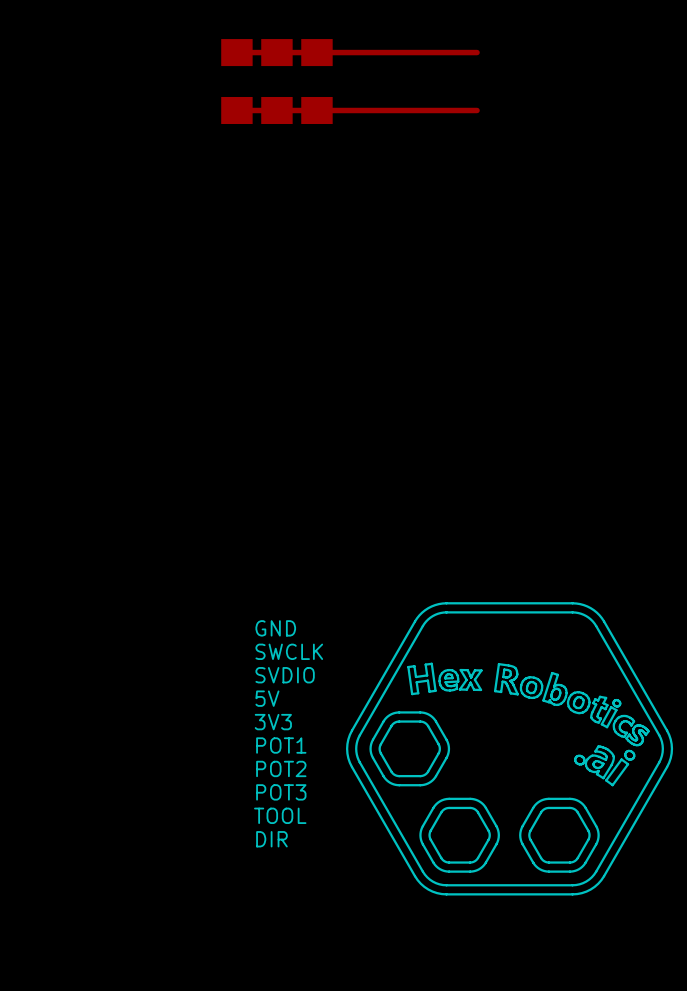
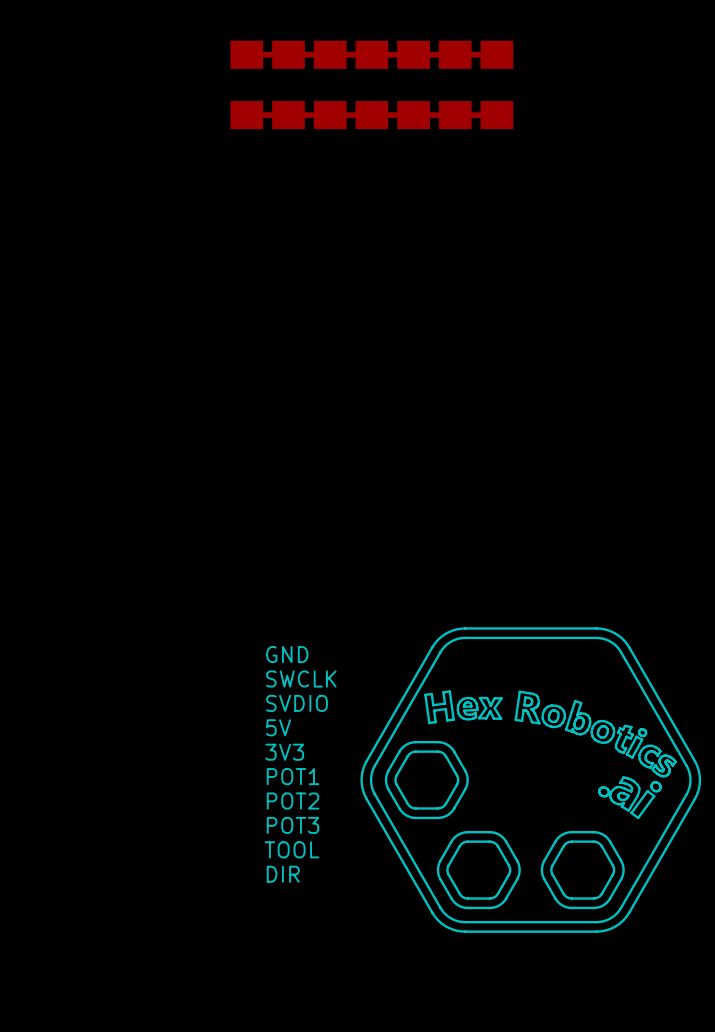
part: none -> (371, 84)
part: none -> (413, 84)
part: none -> (455, 84)
part: none -> (496, 84)

